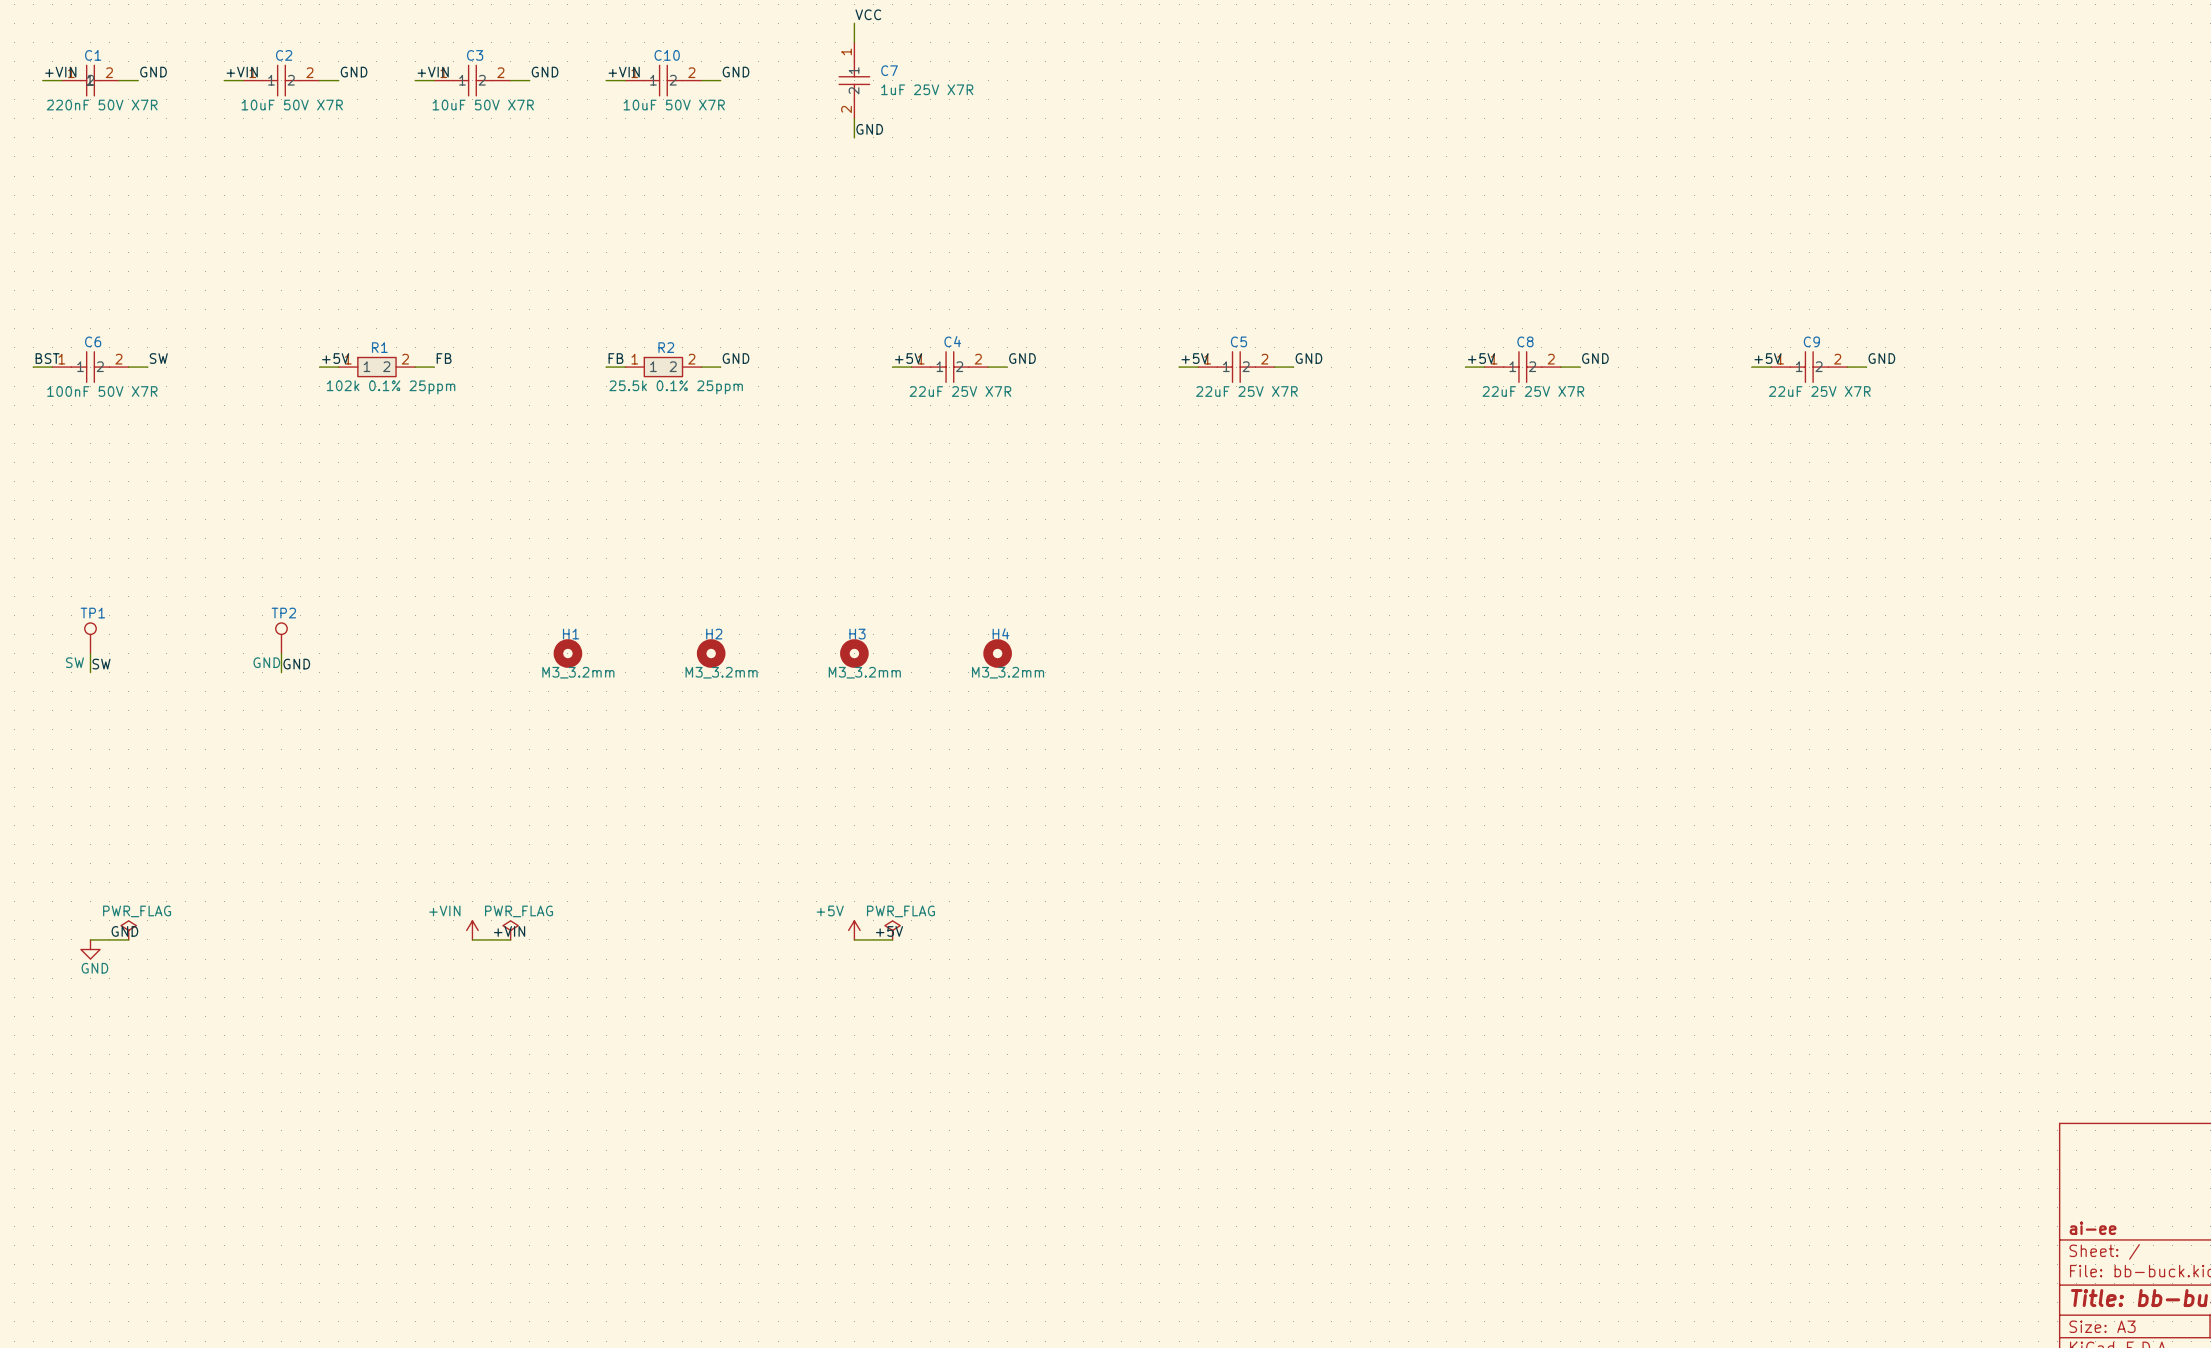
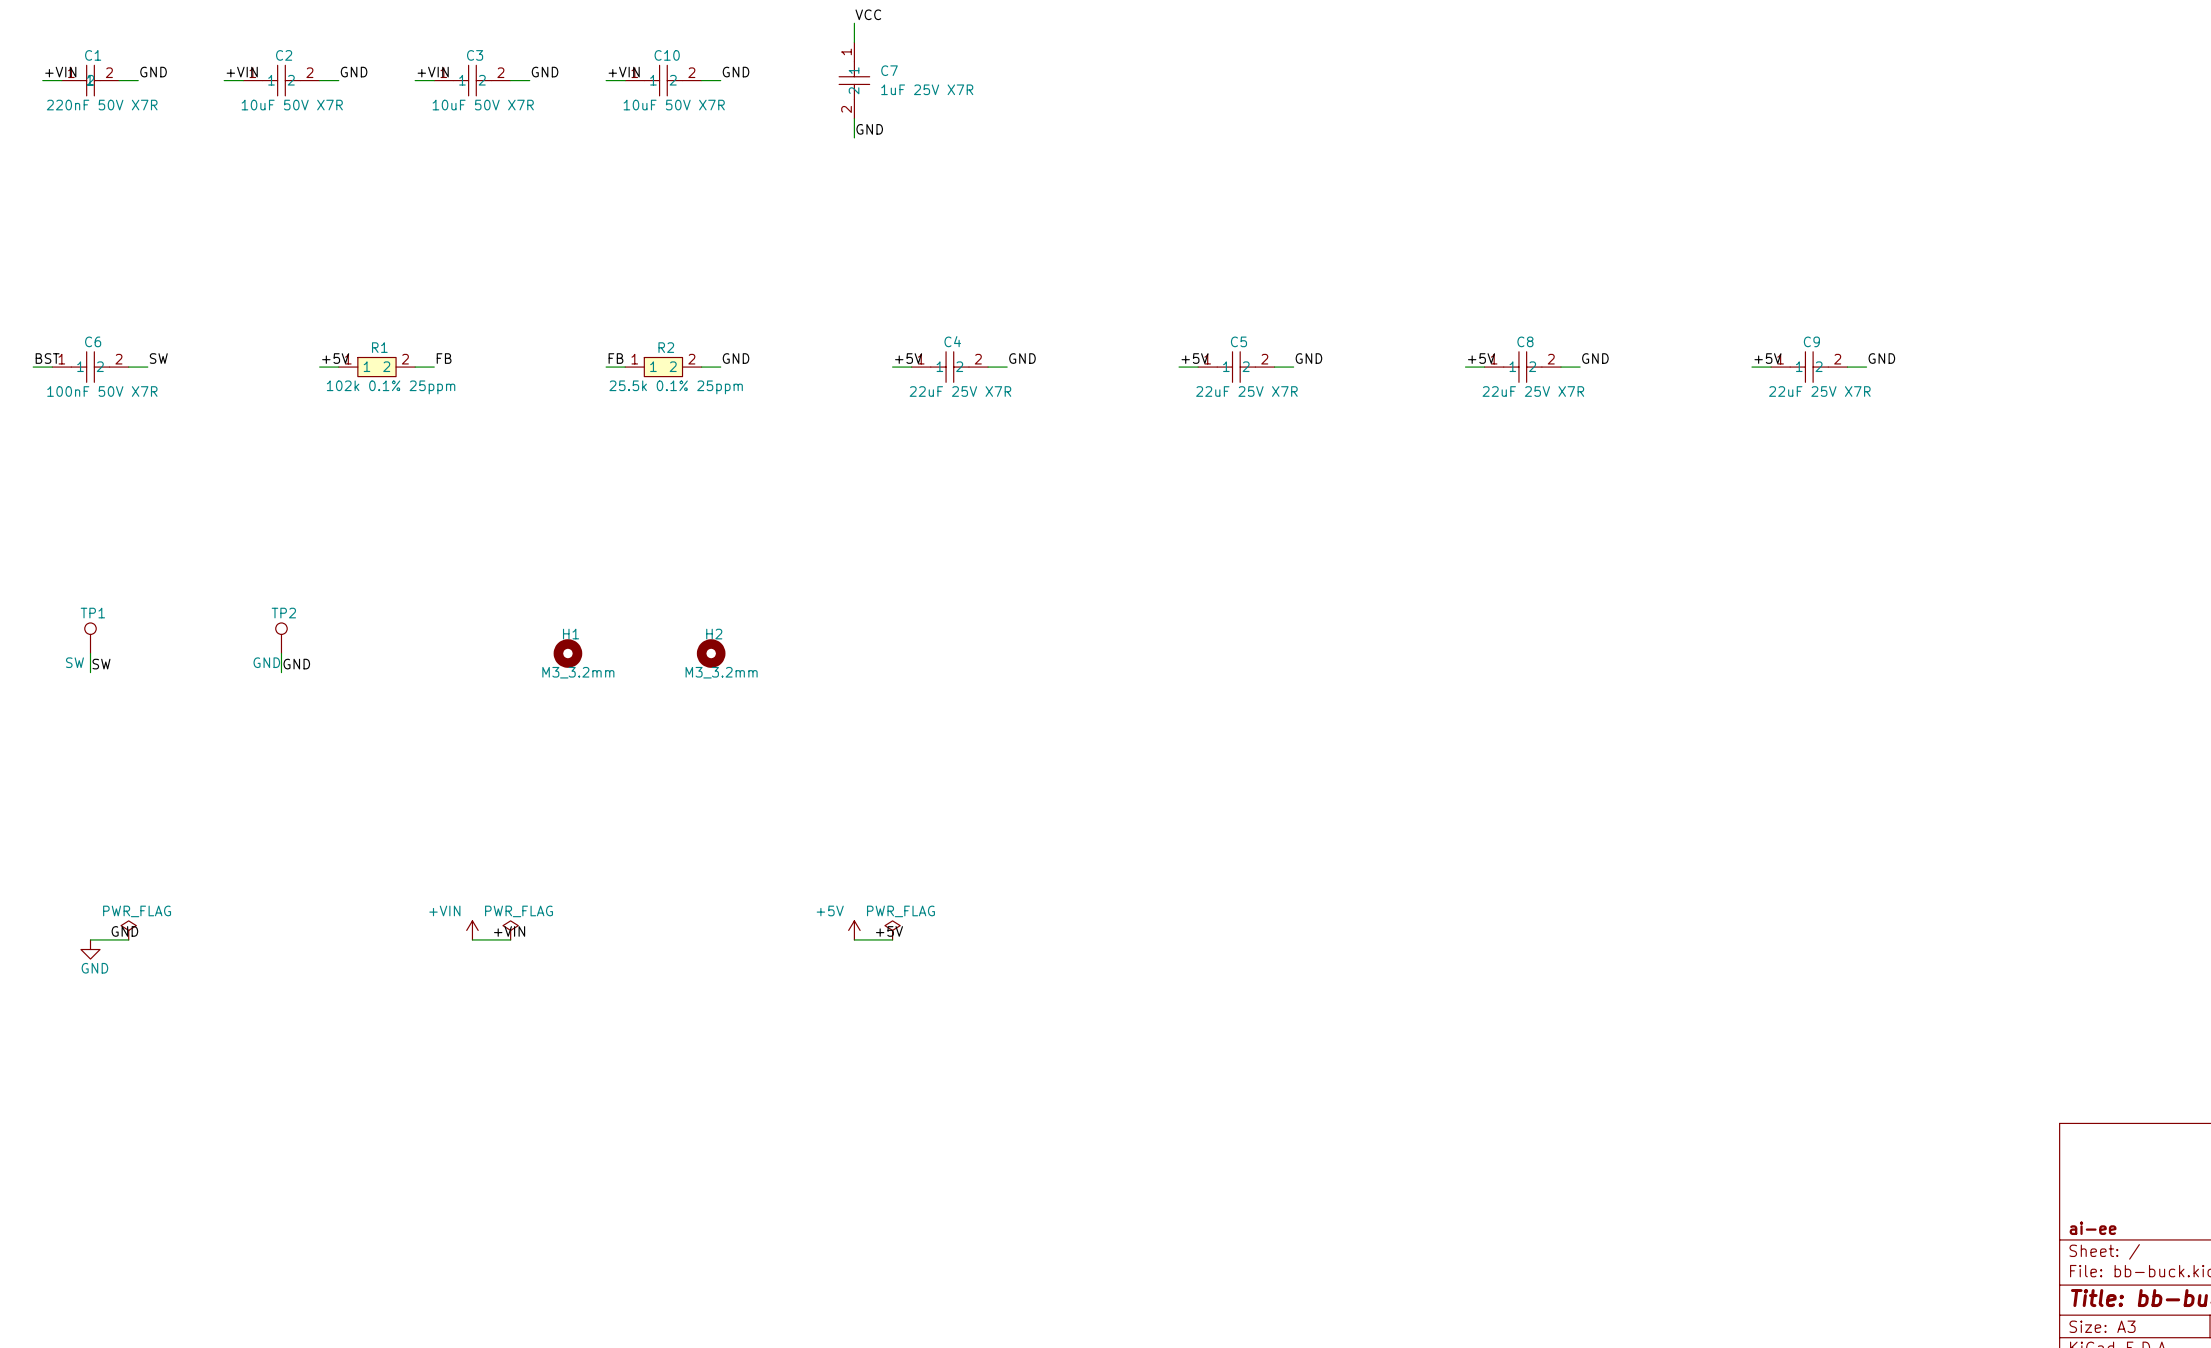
H3: M3_3.2mm (854, 653) -> none
H4: M3_3.2mm (997, 653) -> none

